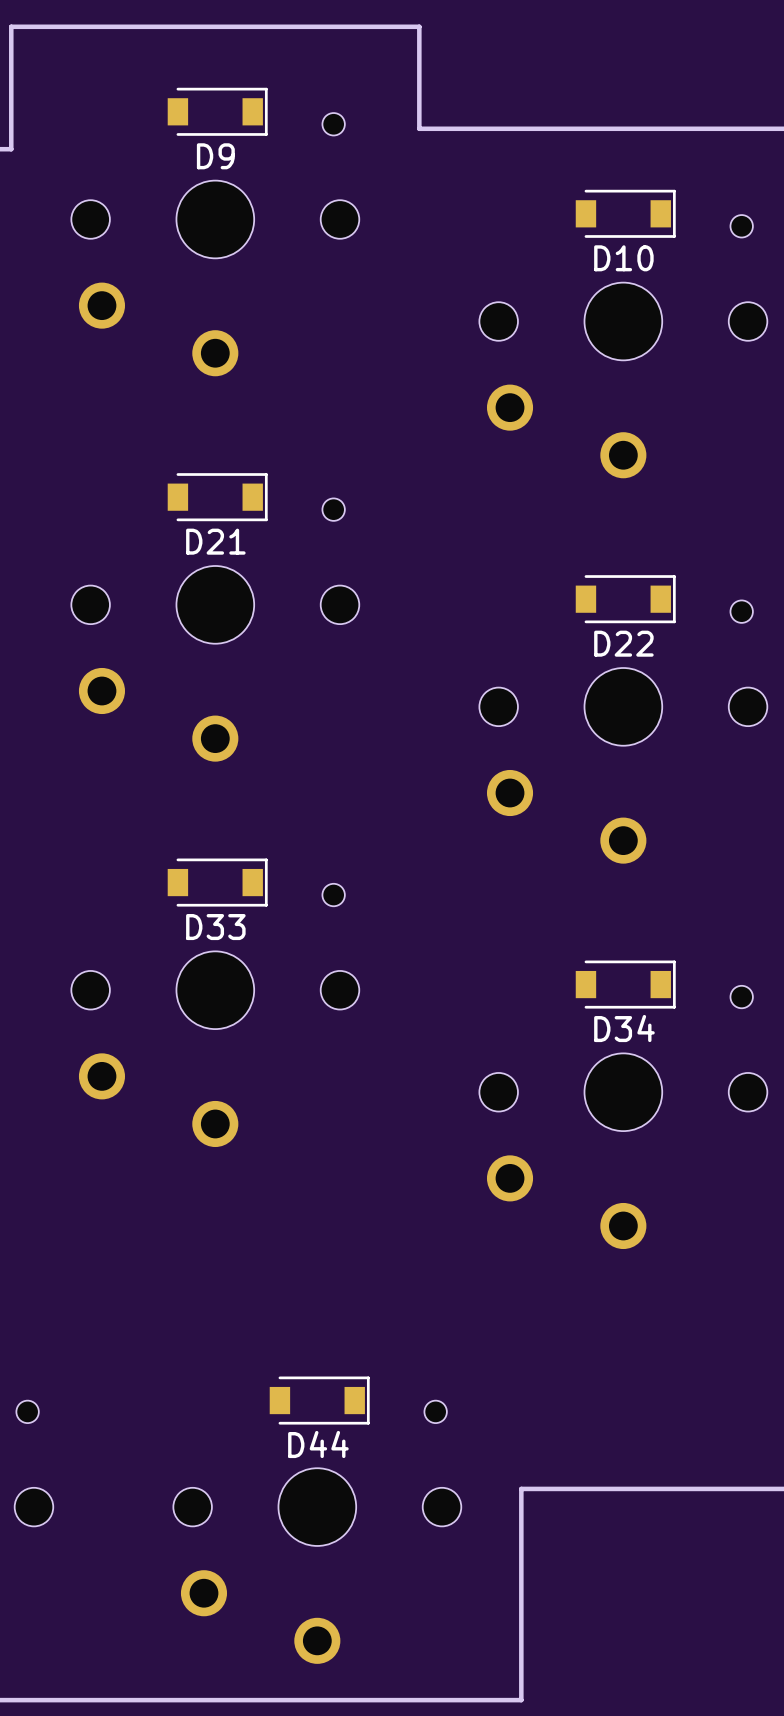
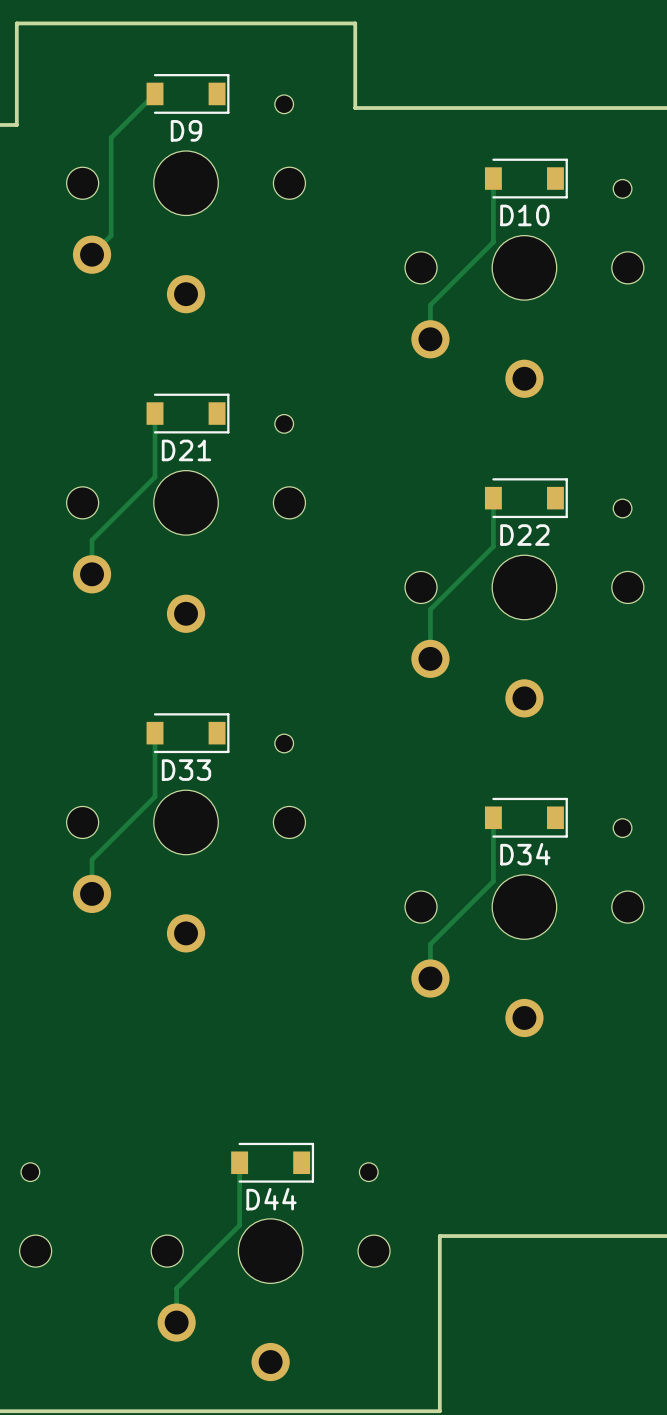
track: none -> (155, 93) (111, 137) (111, 235) (92, 254)
track: none -> (493, 178) (493, 242) (430, 305) (430, 339)
track: none -> (155, 413) (155, 477) (92, 540) (92, 574)
track: none -> (493, 498) (493, 546) (430, 609) (430, 658)
track: none -> (155, 733) (155, 796) (92, 859) (92, 893)
track: none -> (493, 817) (493, 881) (430, 944) (430, 978)
track: none -> (239, 1162) (239, 1225) (176, 1288) (176, 1322)

